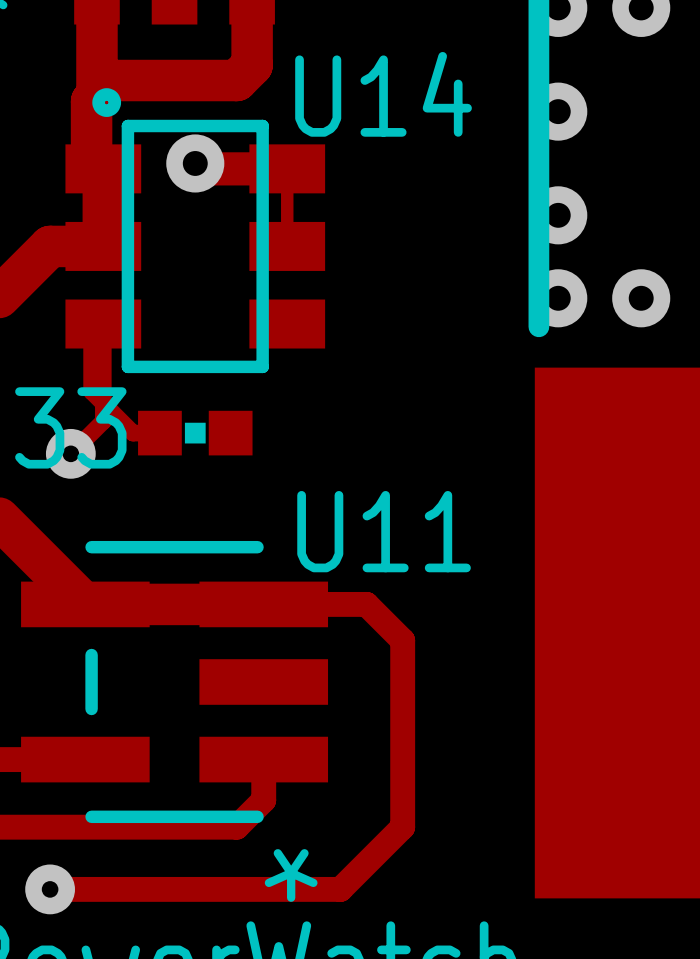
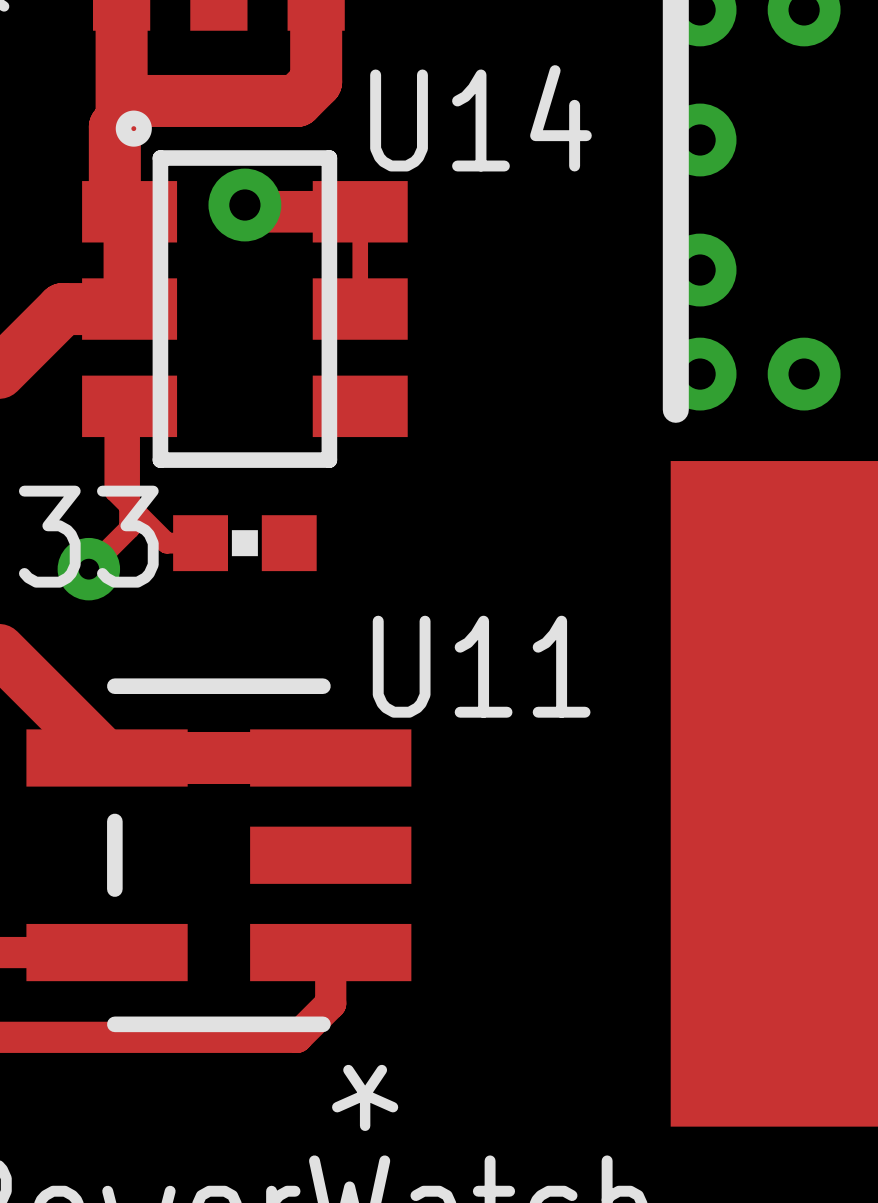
track: (263, 604) (366, 604) (402, 640) (402, 827) (340, 889) (50, 889) -> none
via: (50, 889) -> none

